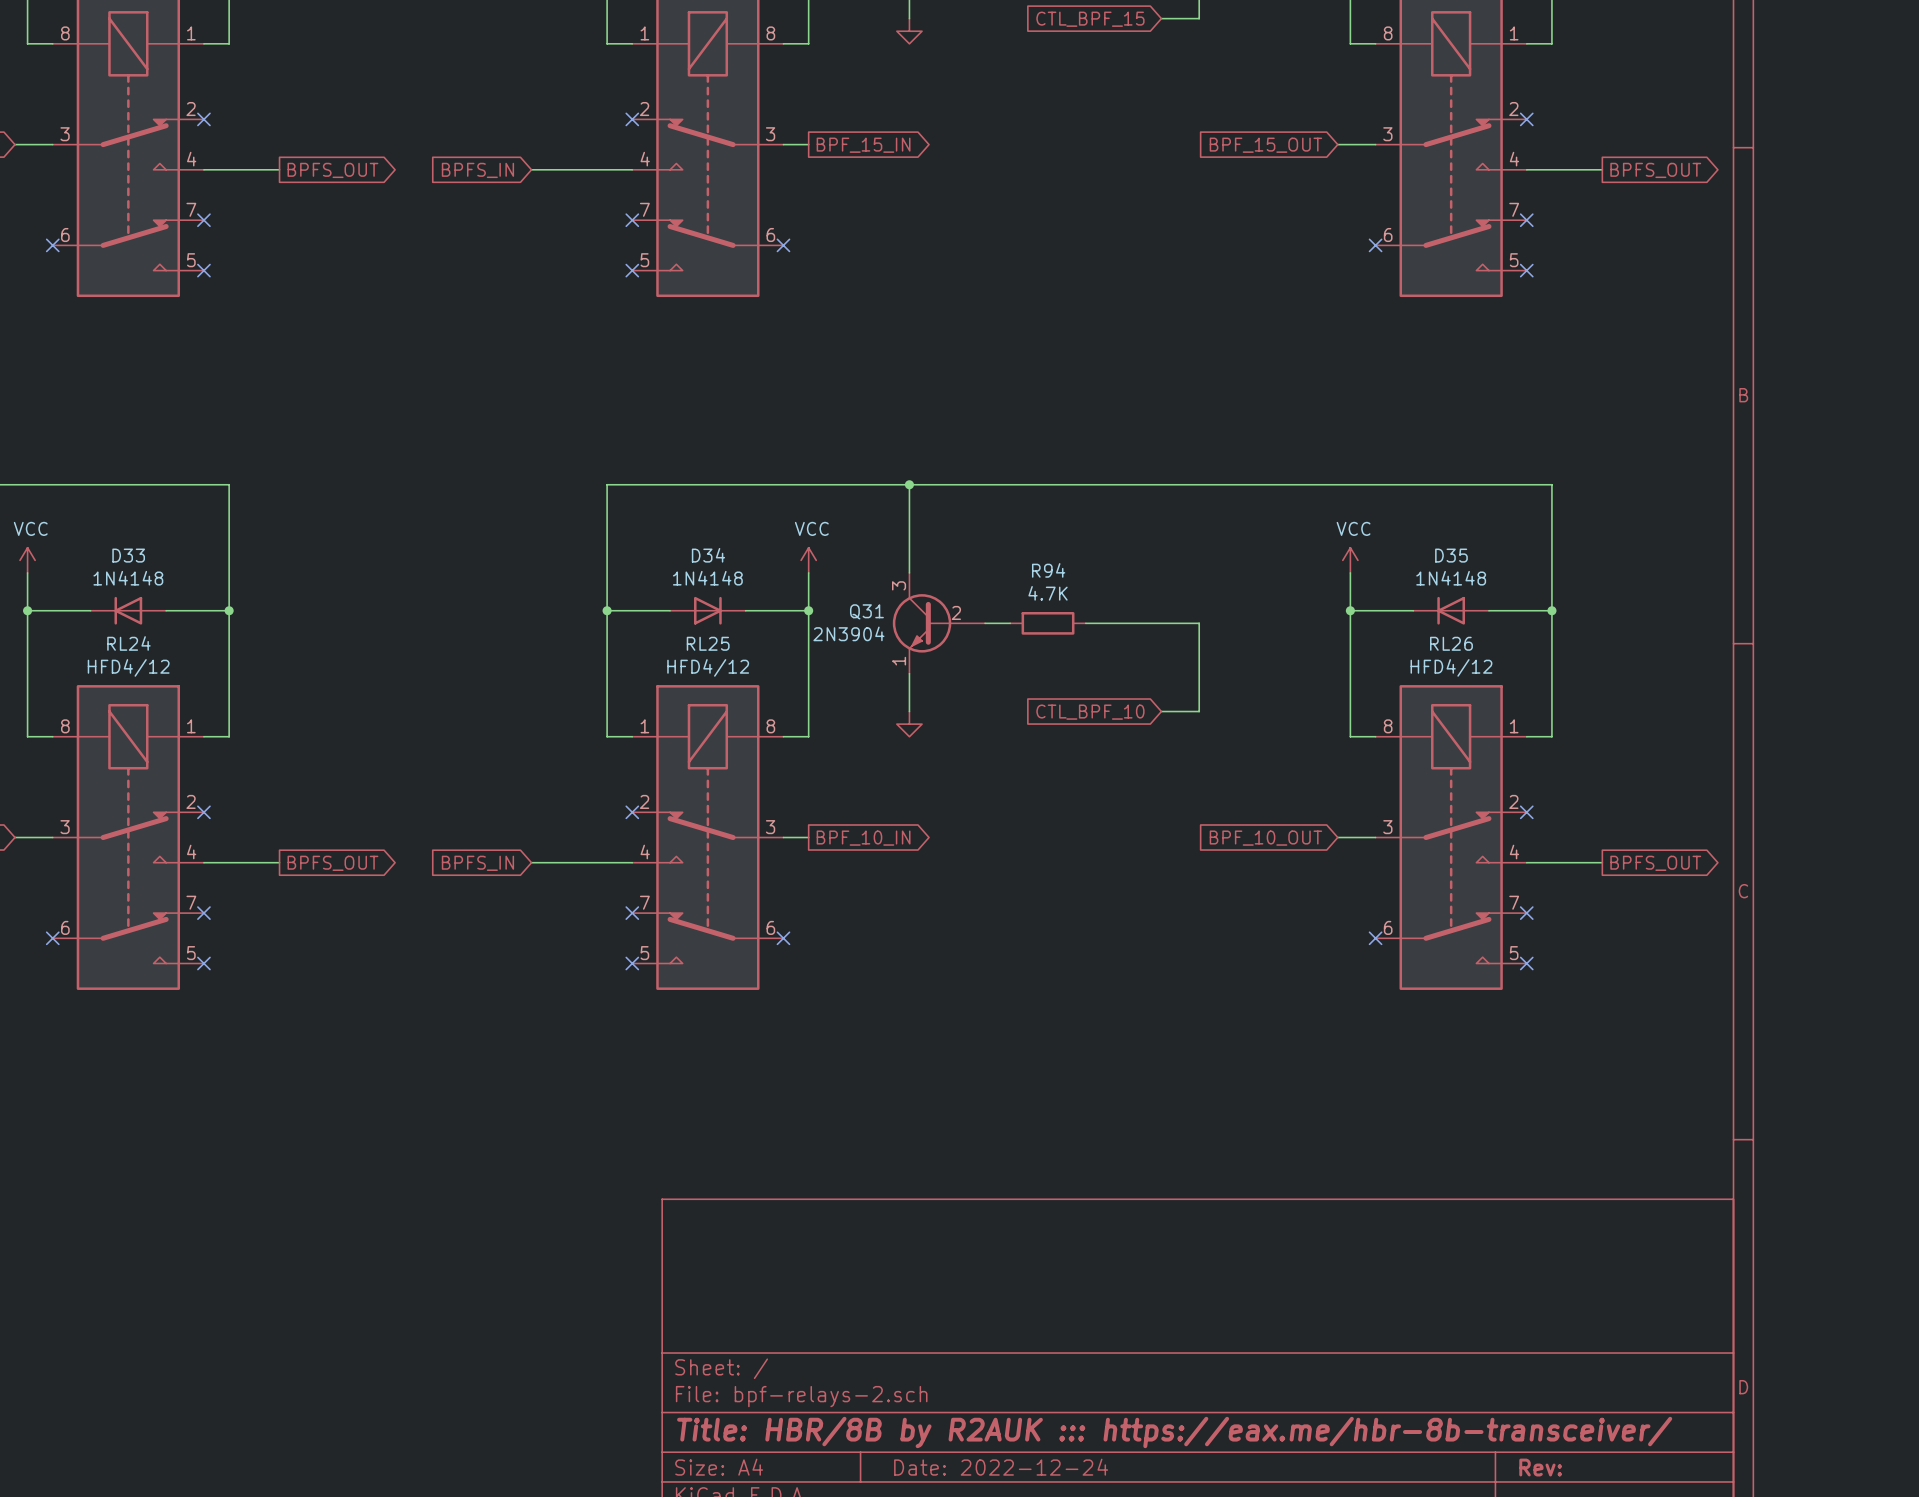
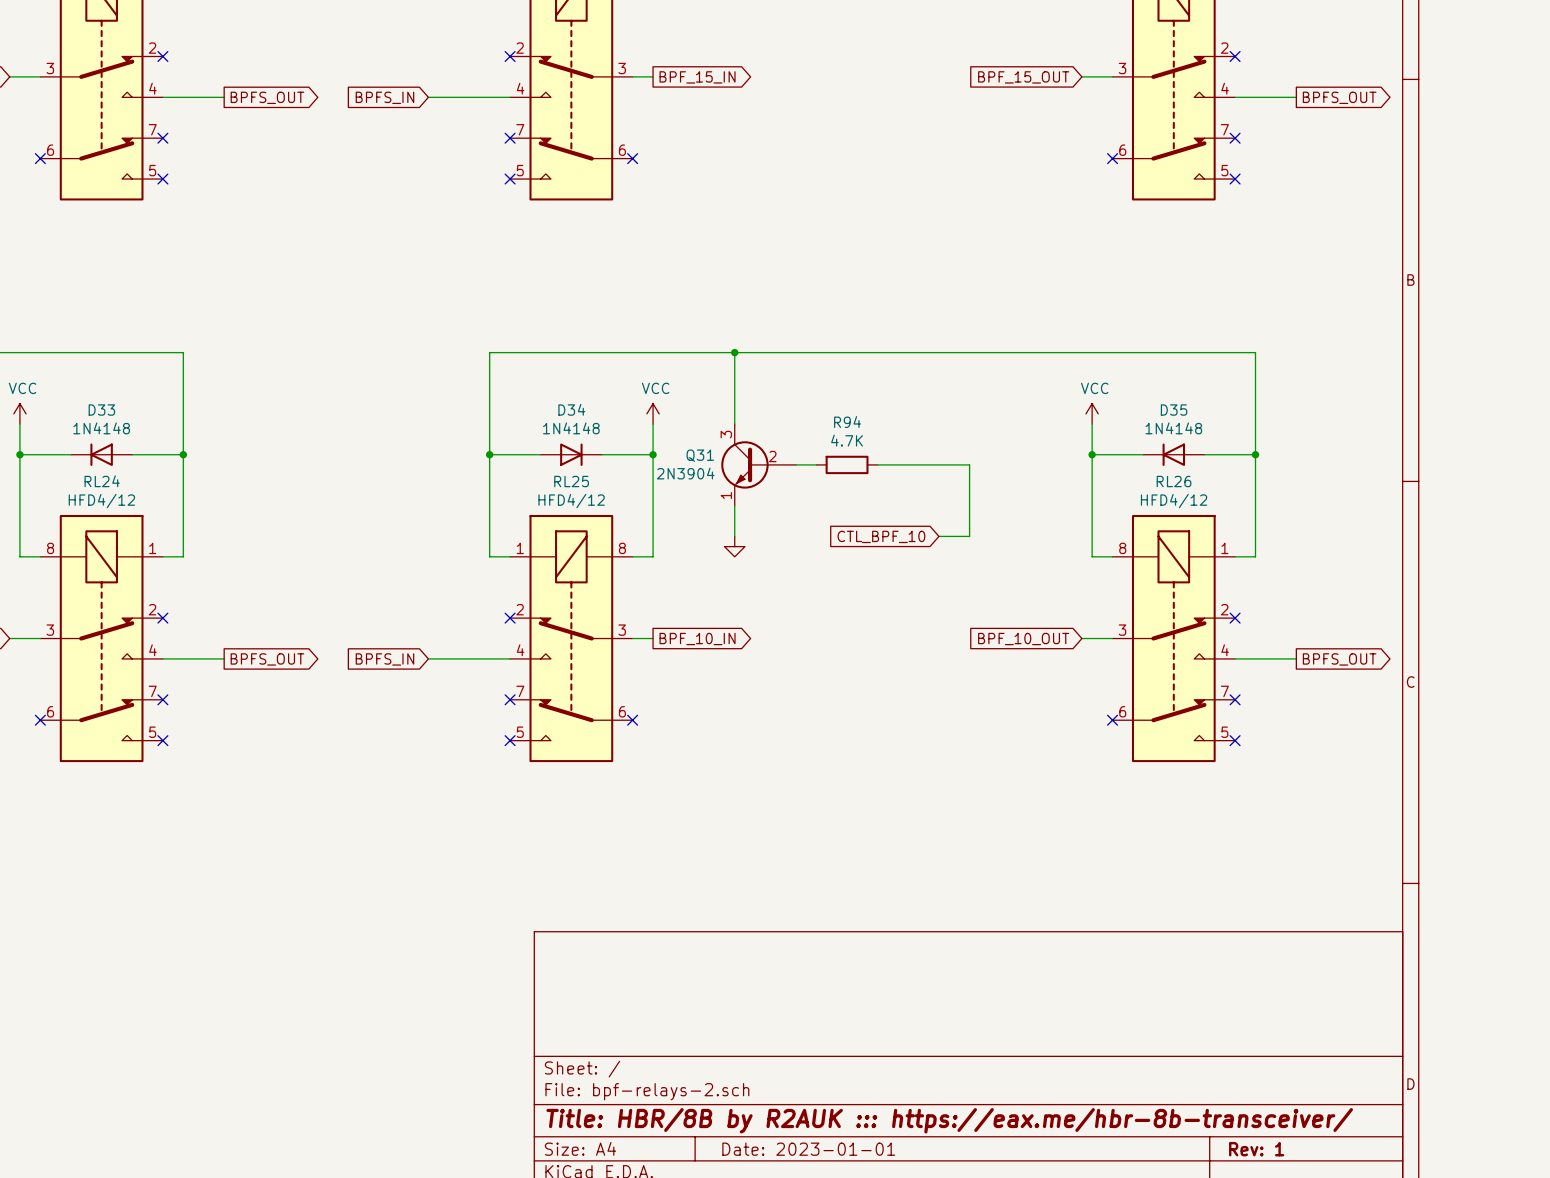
title block: Date: 2022-12-24 (1001, 1467) -> Date: 2023-01-01 (808, 1149)
title block: Rev: (1540, 1467) -> Rev: 1 (1256, 1149)

